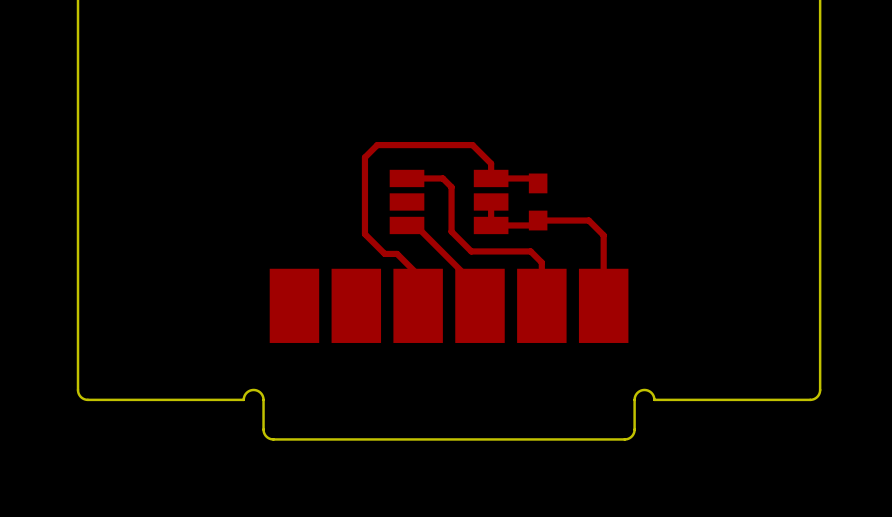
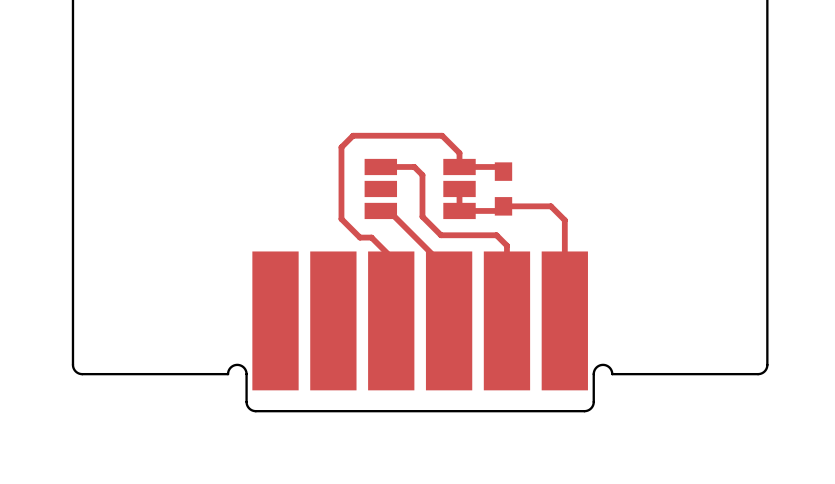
part: (449, 305) -> none
part: none -> (420, 320)

